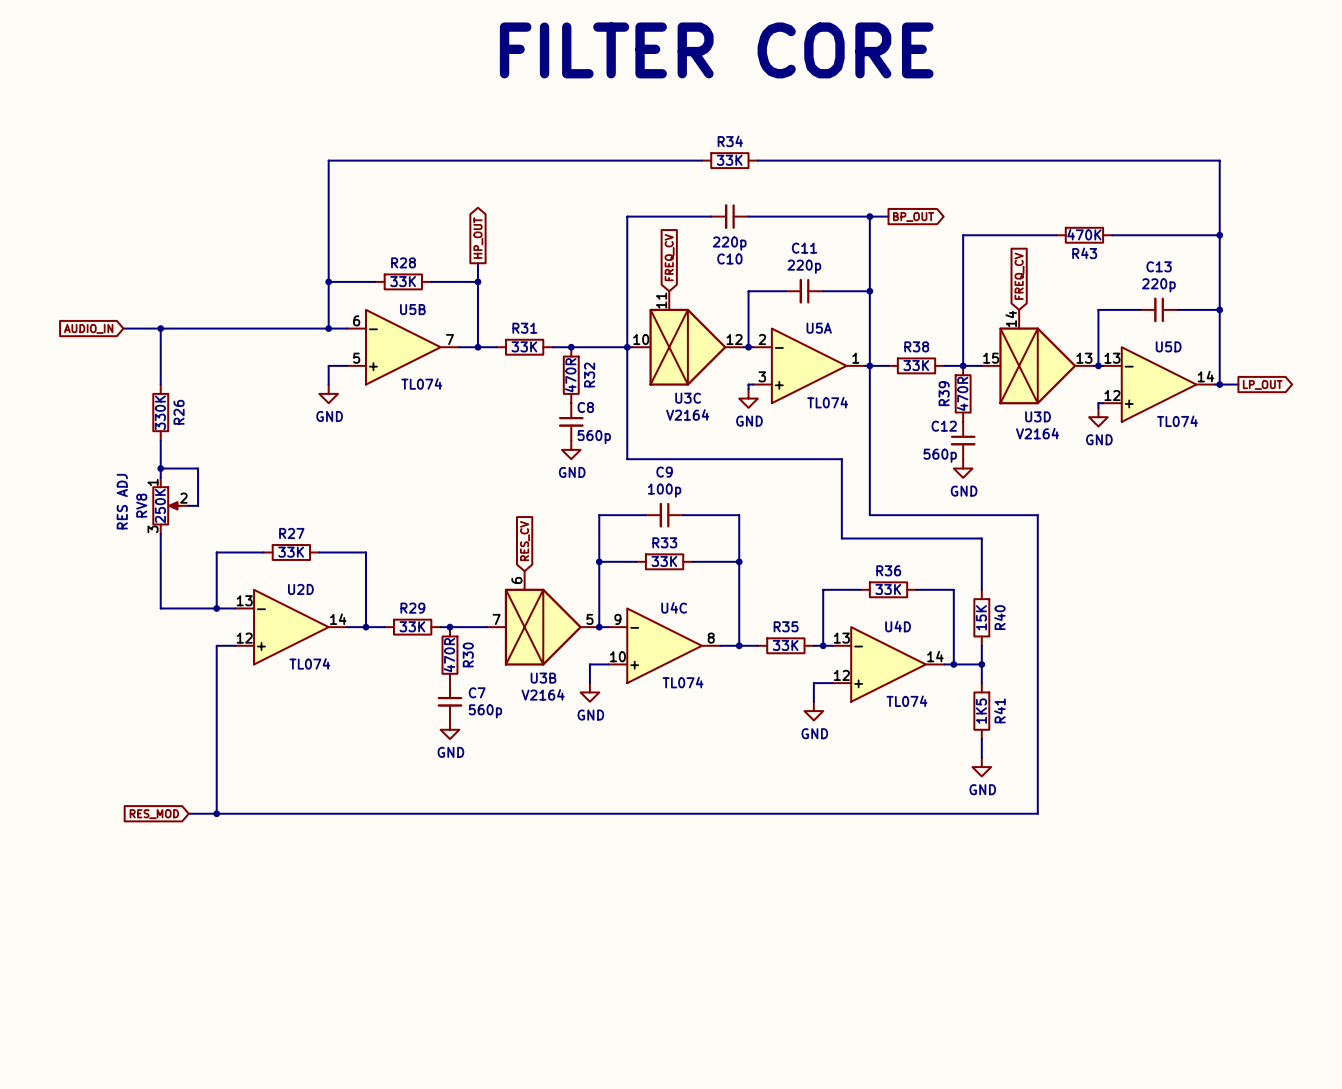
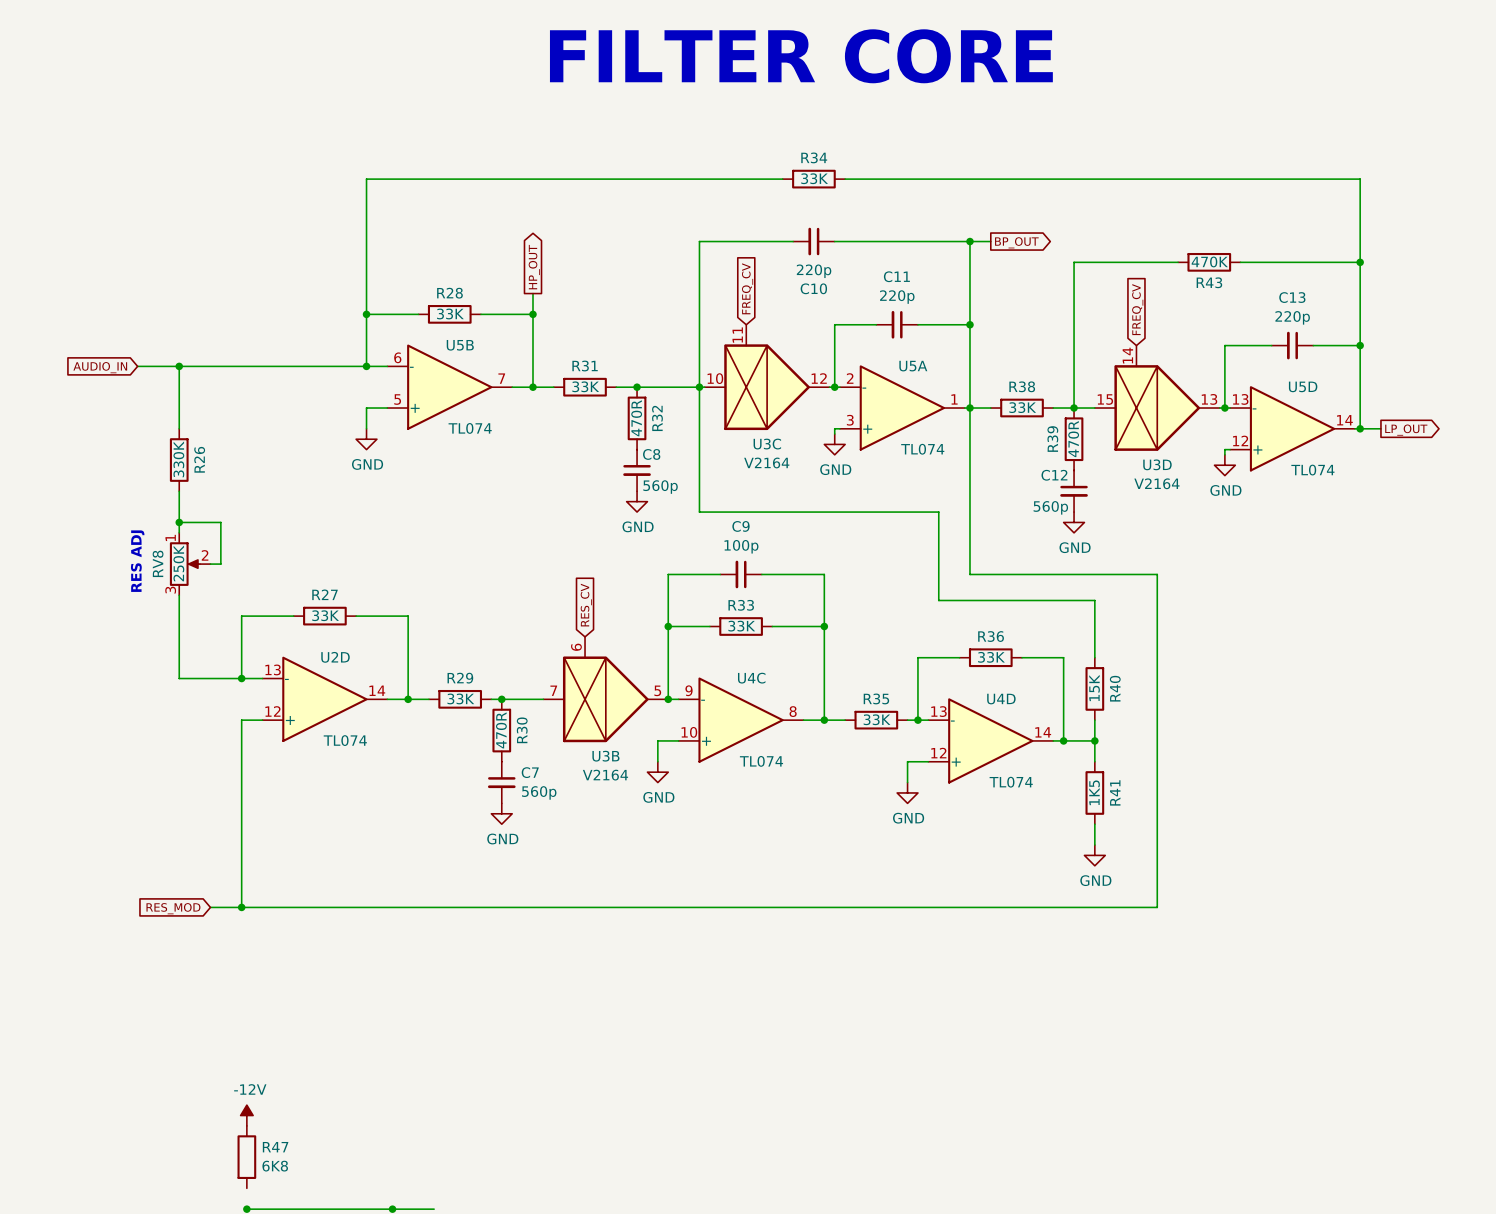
power symbol: none -> -12V (246, 1115)
R47: none -> 6K8 (246, 1157)
wire: none -> (246, 1209) (434, 1209)
junction: none -> (246, 1209)
junction: none -> (392, 1209)

